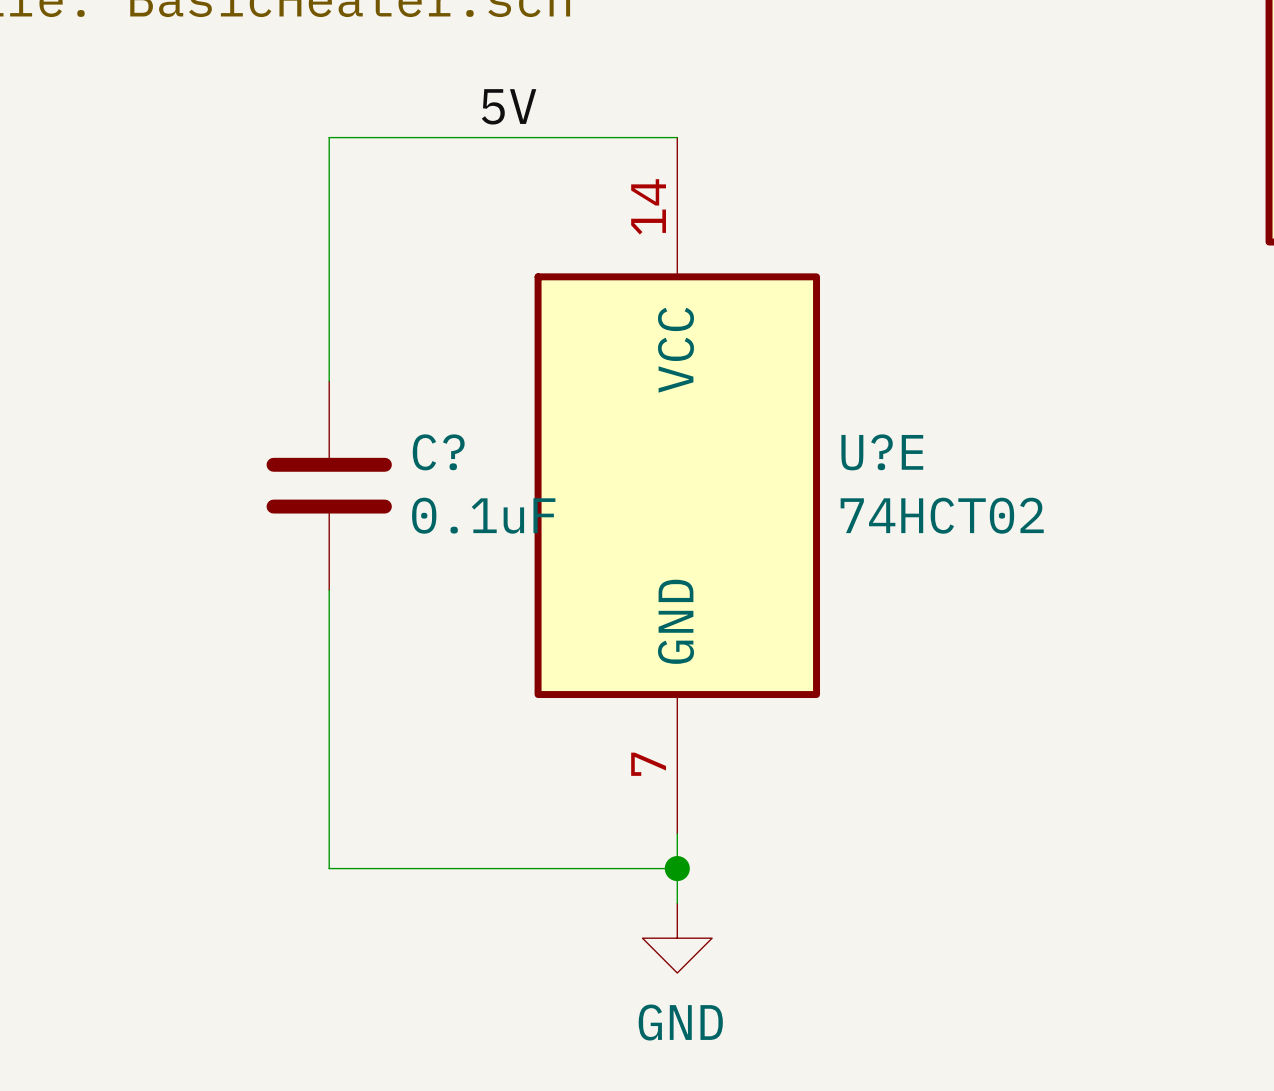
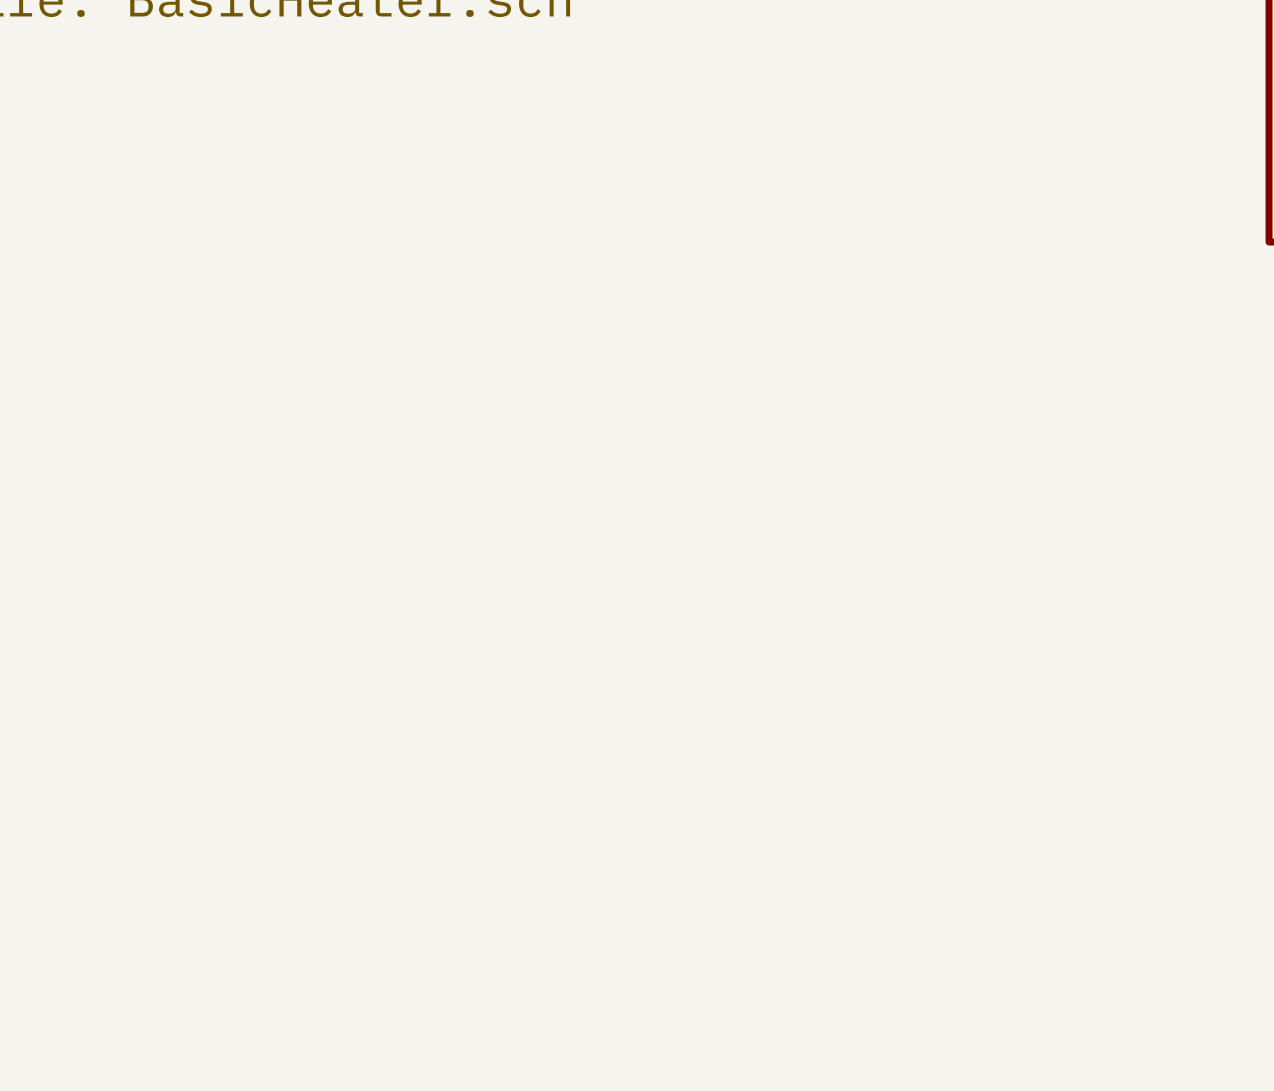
label: 5V (509, 106) -> none
wire: (677, 137) (329, 137) (329, 381) -> none
C?: 0.1uF (329, 485) -> none
U?E: 74HCT02 (677, 485) -> none
wire: (329, 590) (329, 868) (677, 868) -> none
wire: (677, 833) (677, 903) -> none
junction: (677, 868) -> none
power symbol: GND (677, 938) -> none

